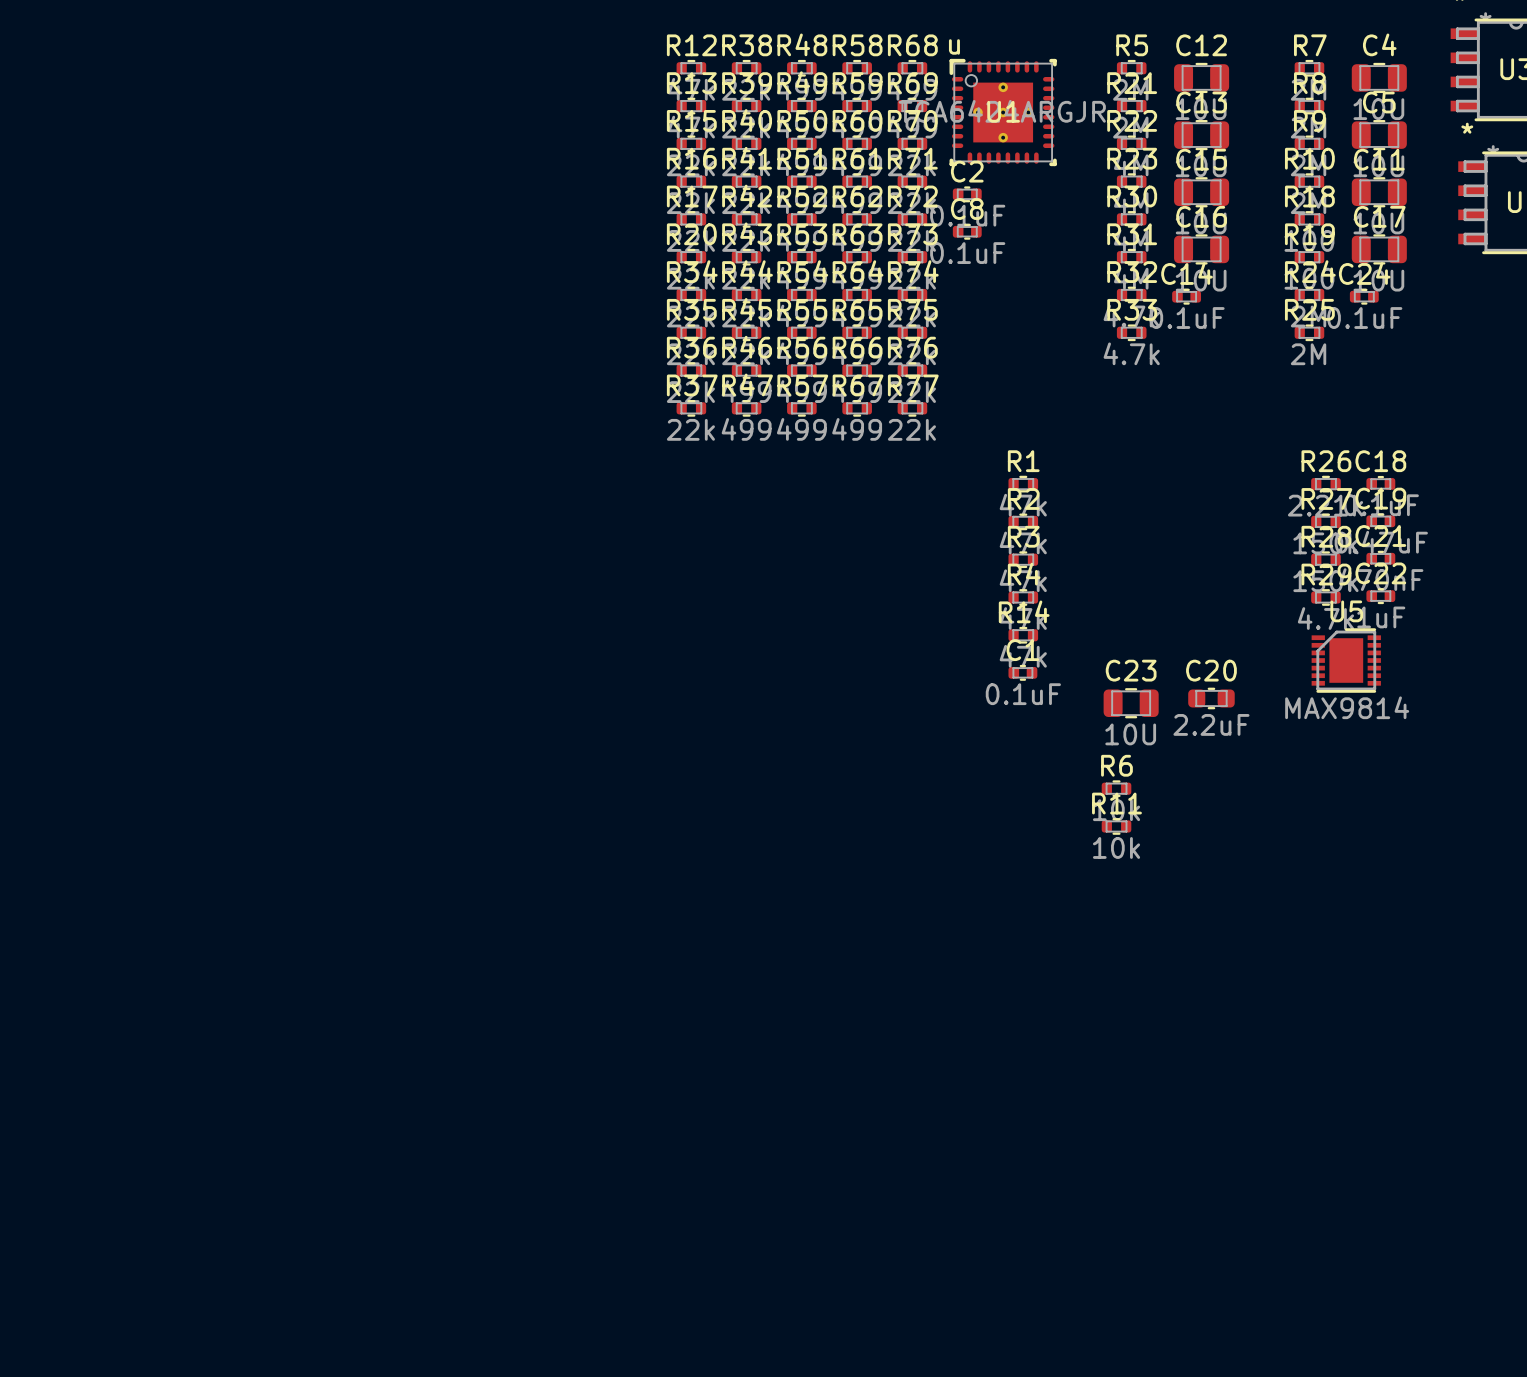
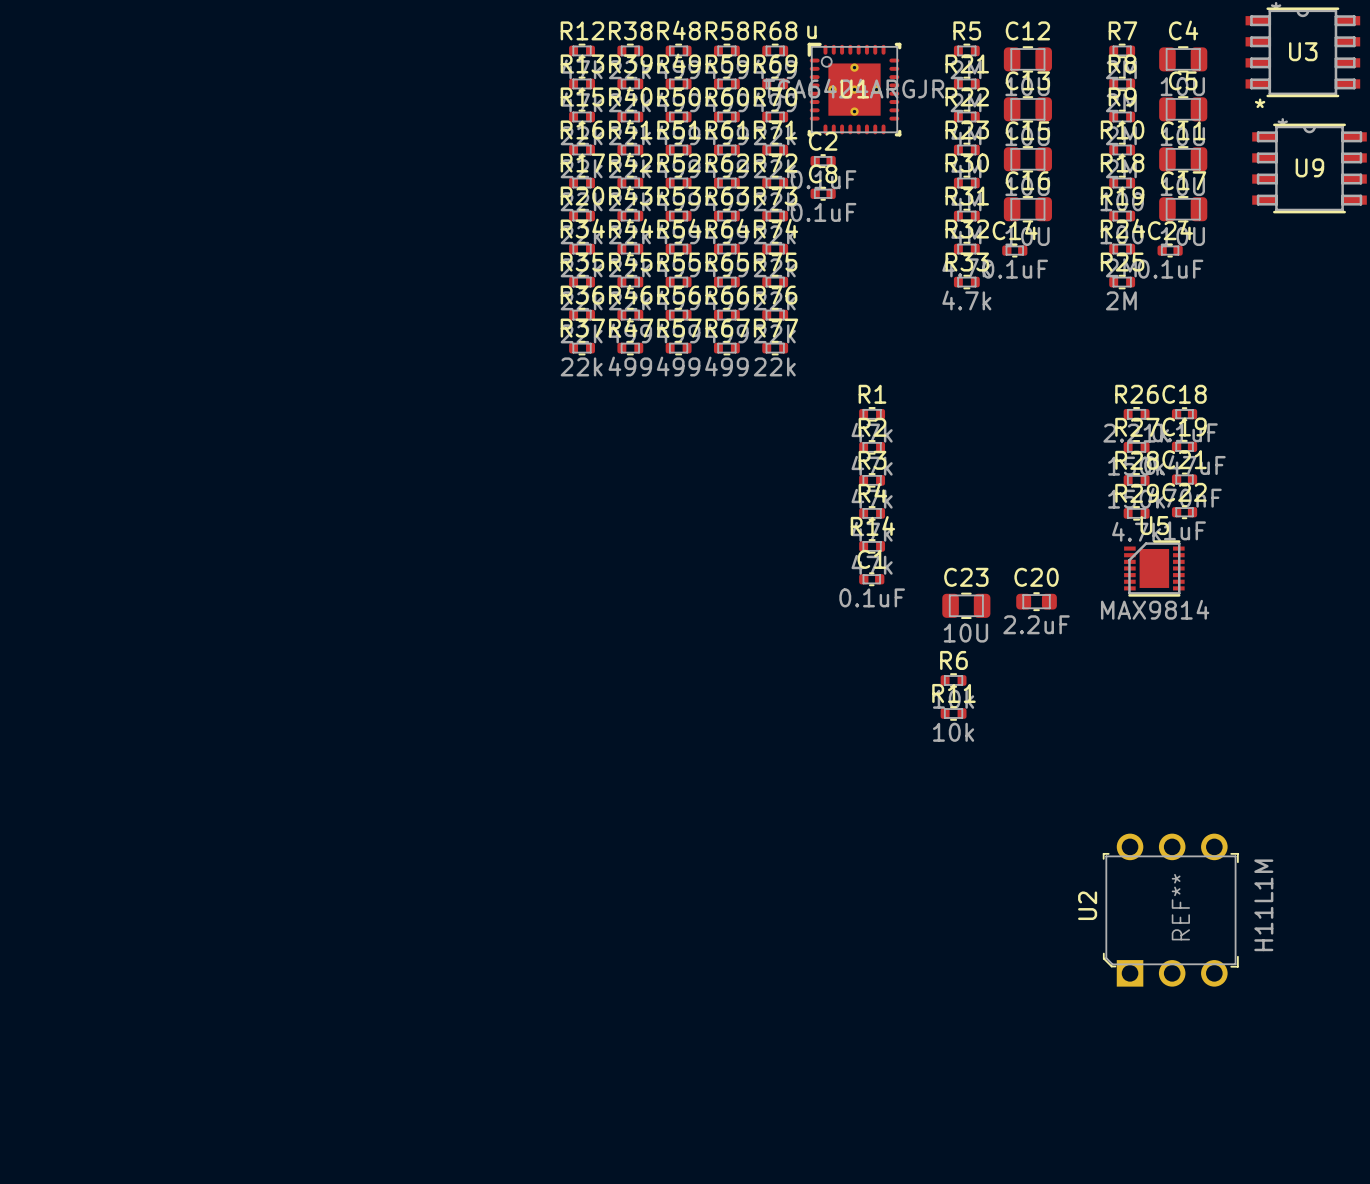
U2: none -> H11L1M (1170, 910)

